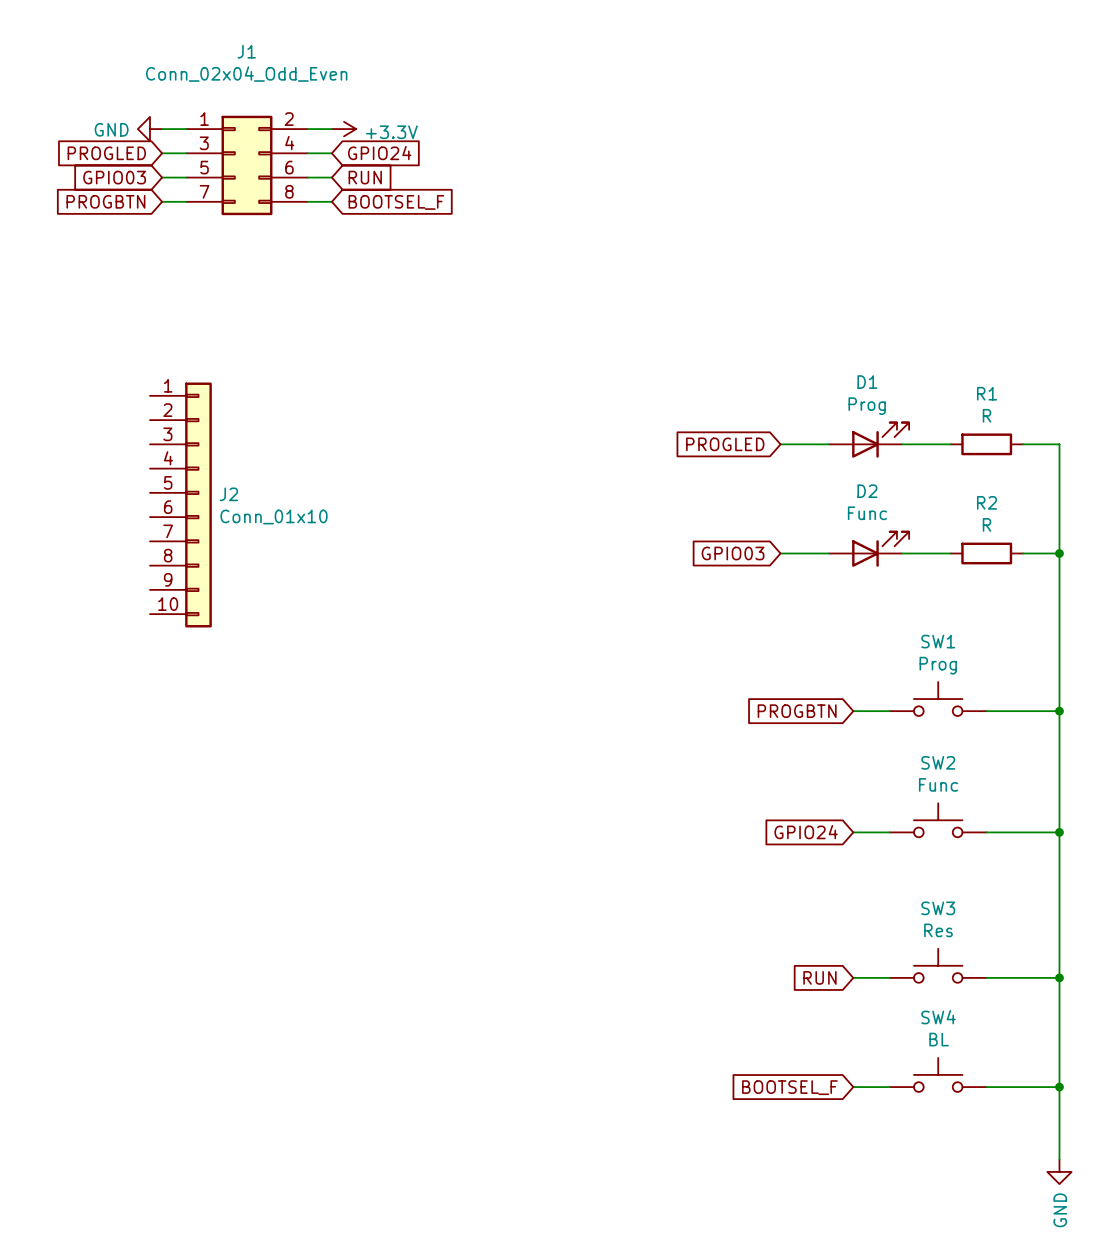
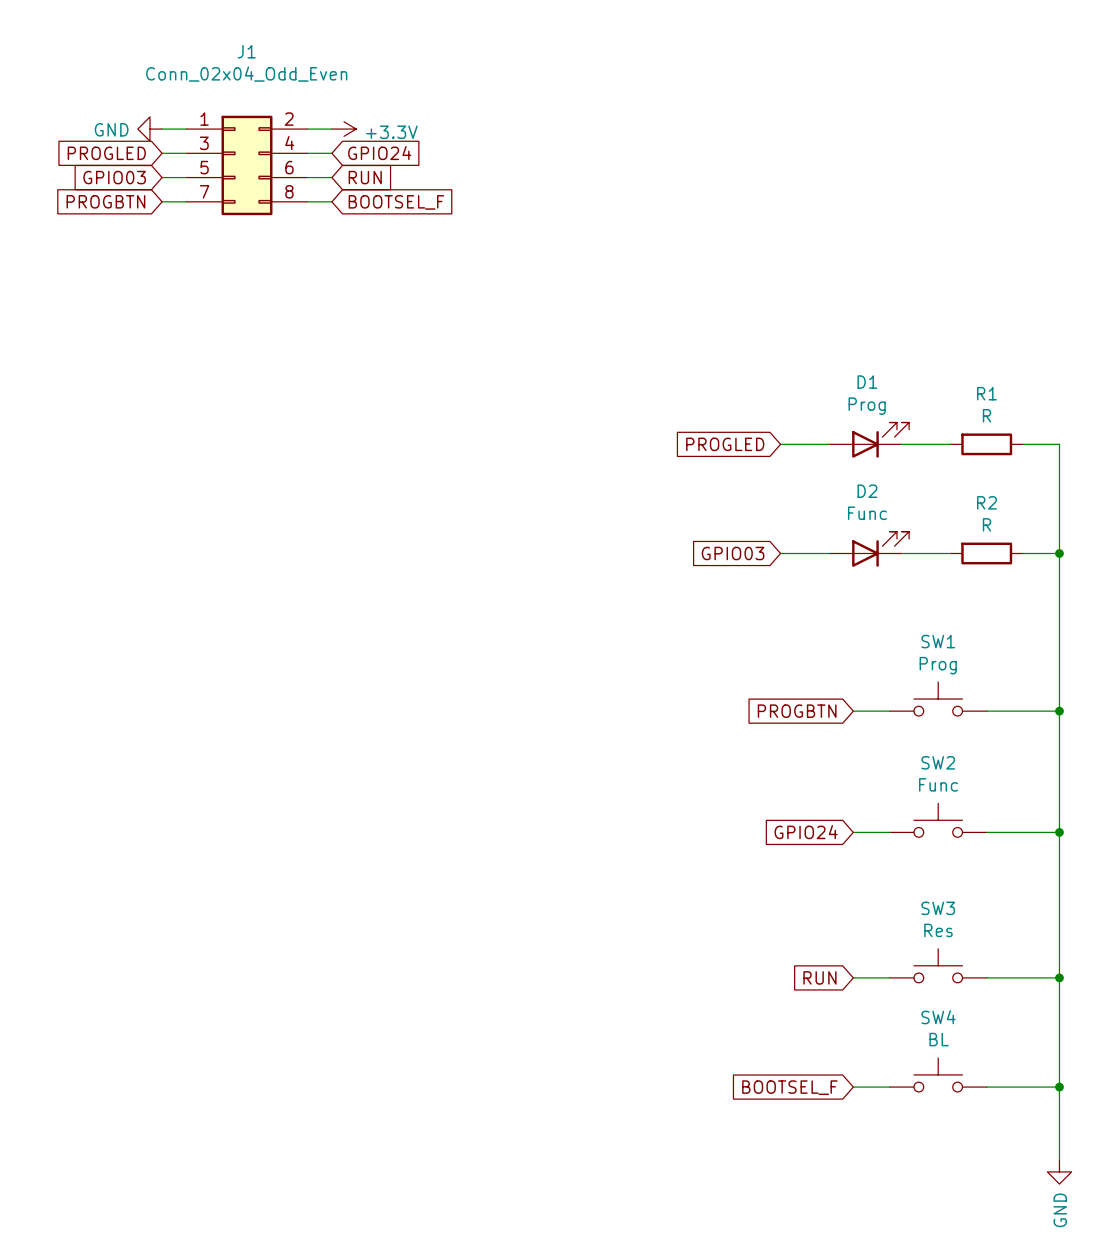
J2: Conn_01x10 (180, 504) -> none

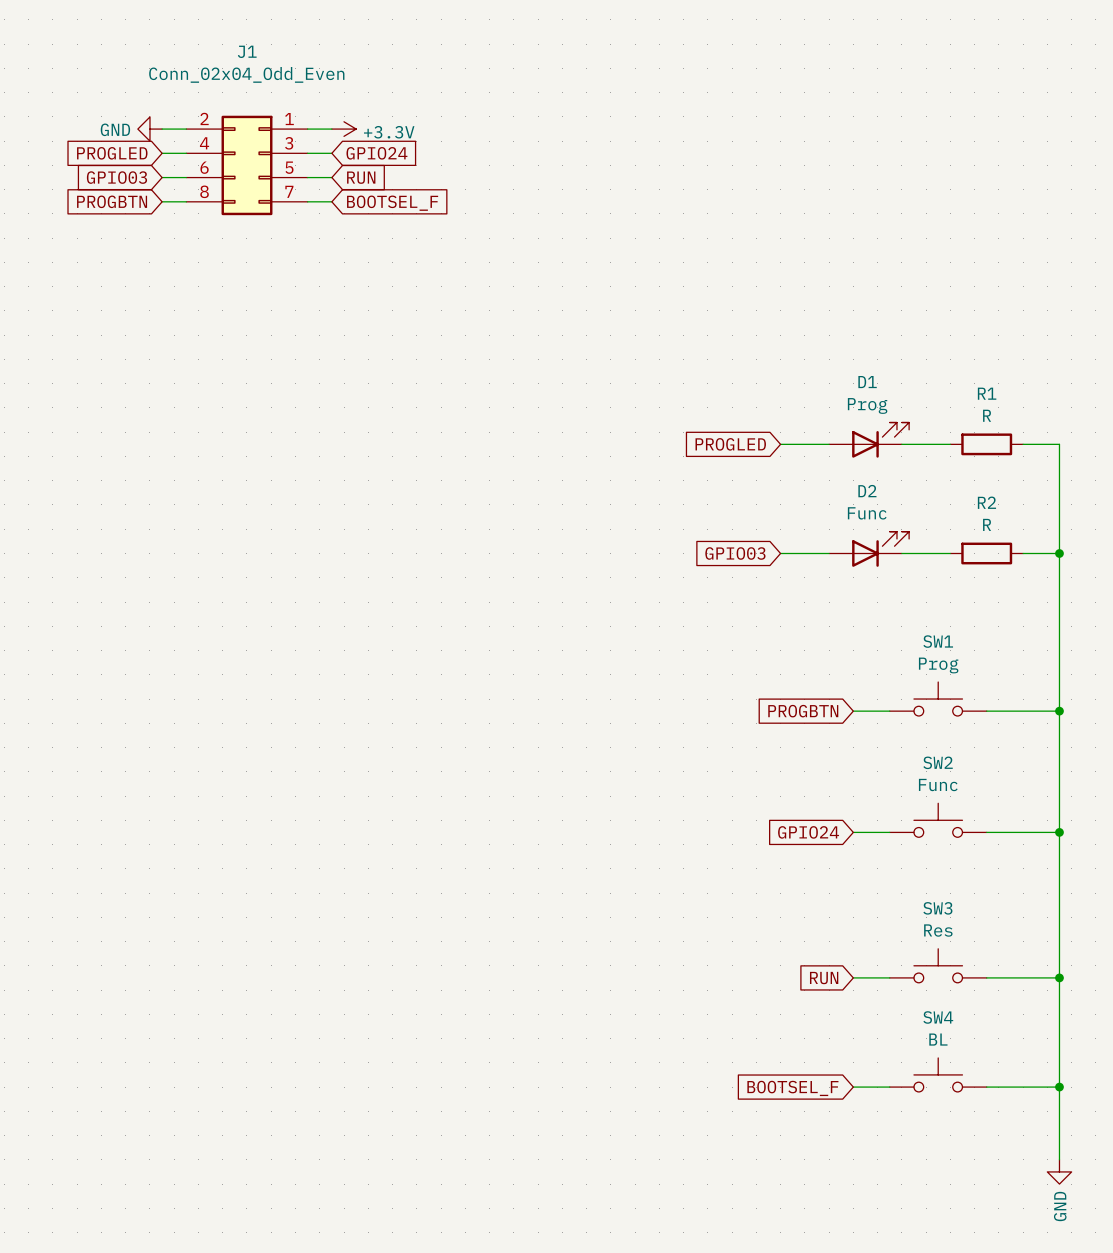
J1 flip: as is (246, 165) -> left-right (246, 165)

